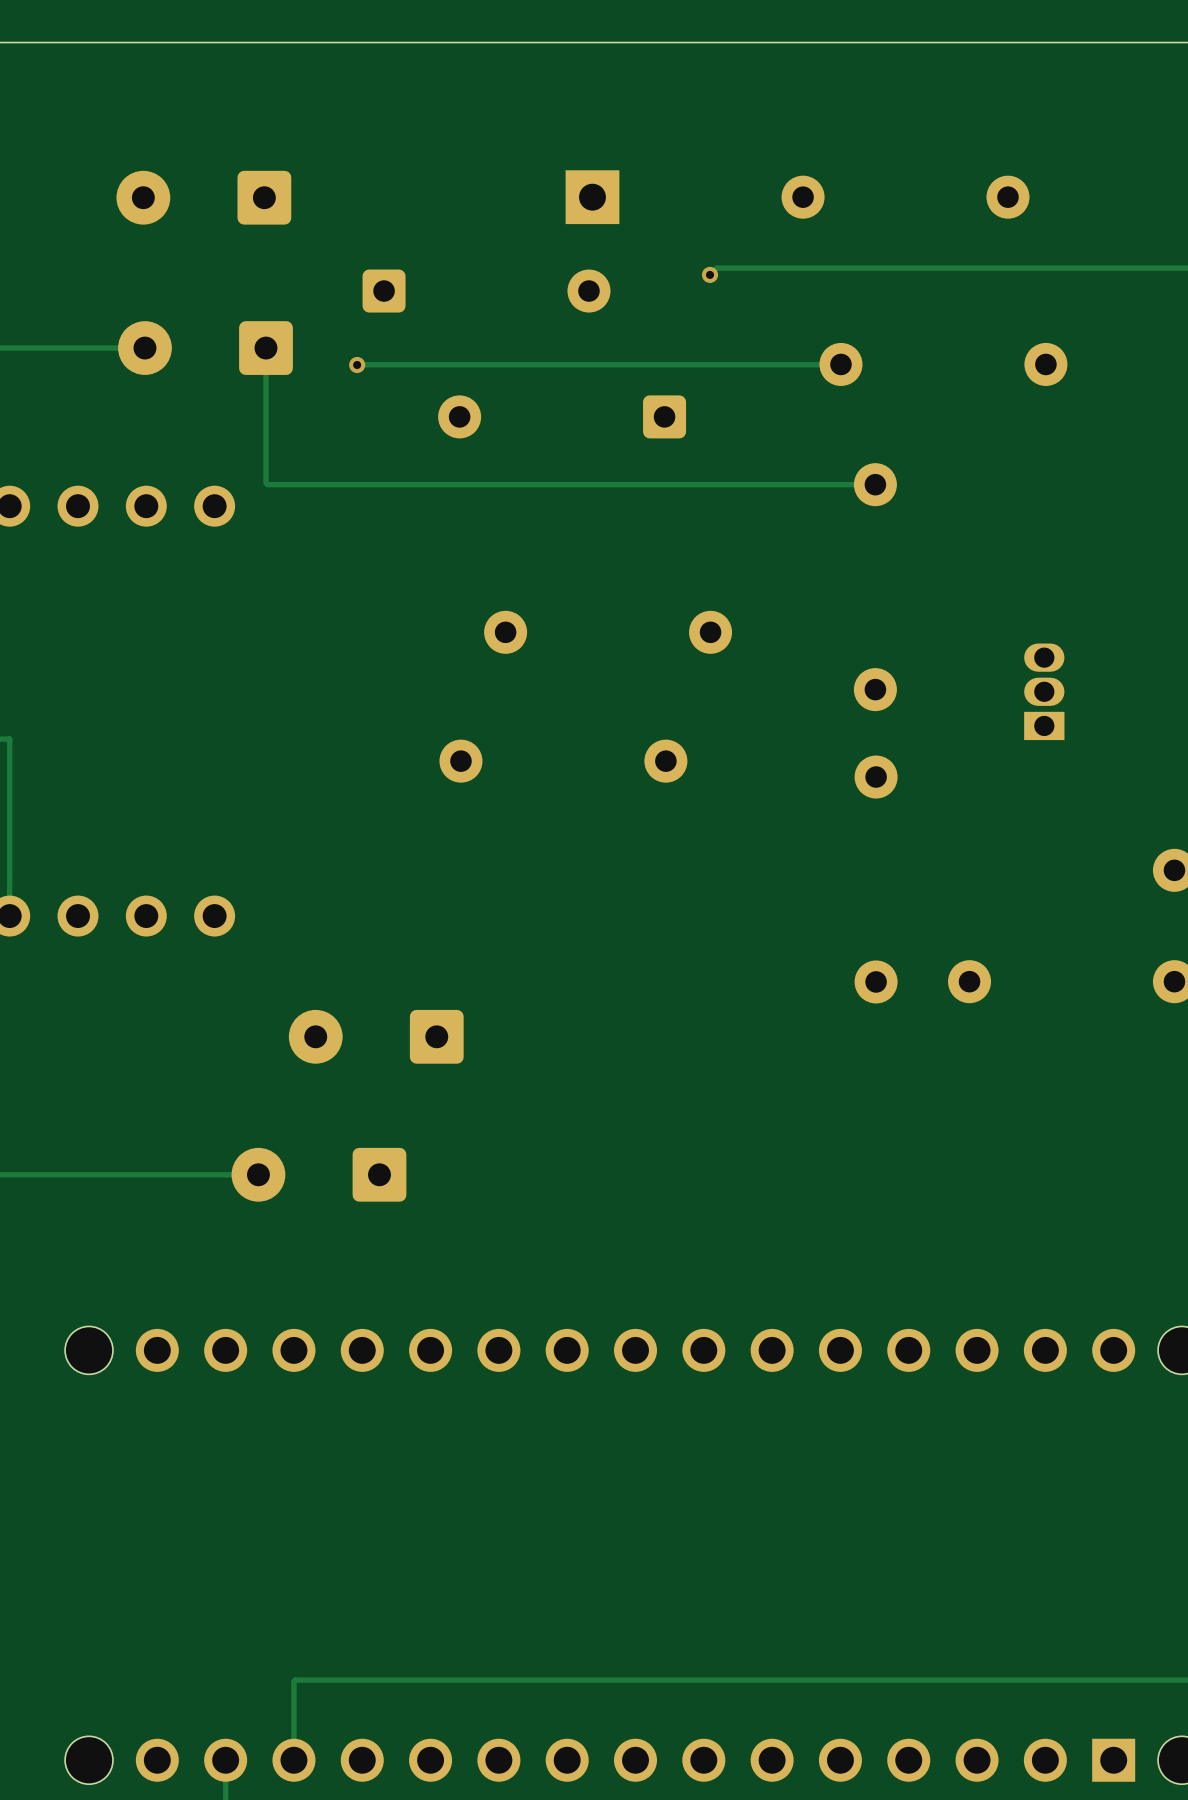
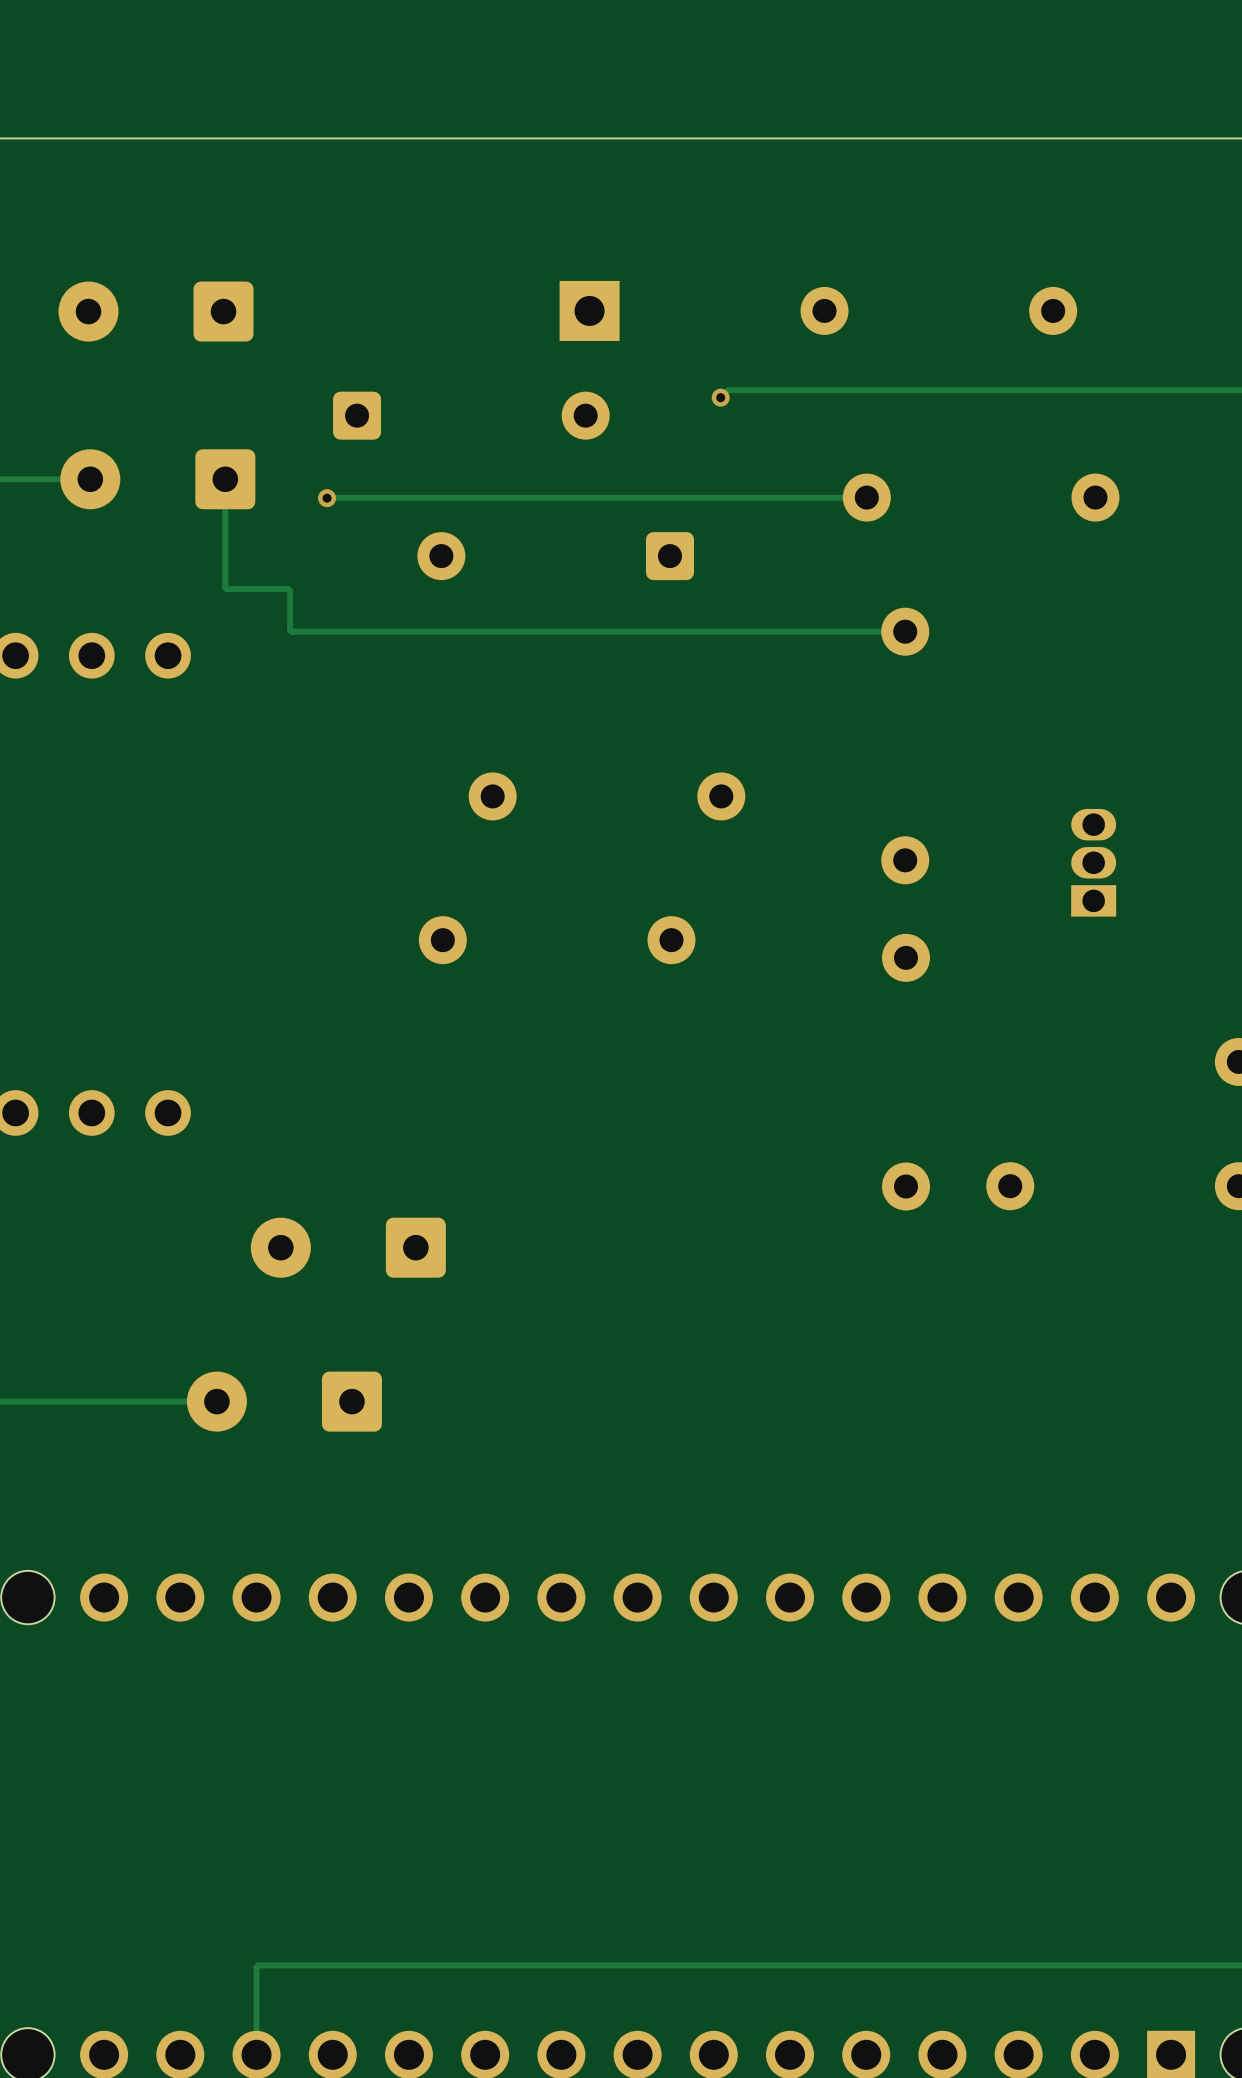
track: (265, 445) (265, 483) -> none
track: (325, 484) (267, 484) -> (291, 631) (290, 591) (288, 589) (225, 587)

